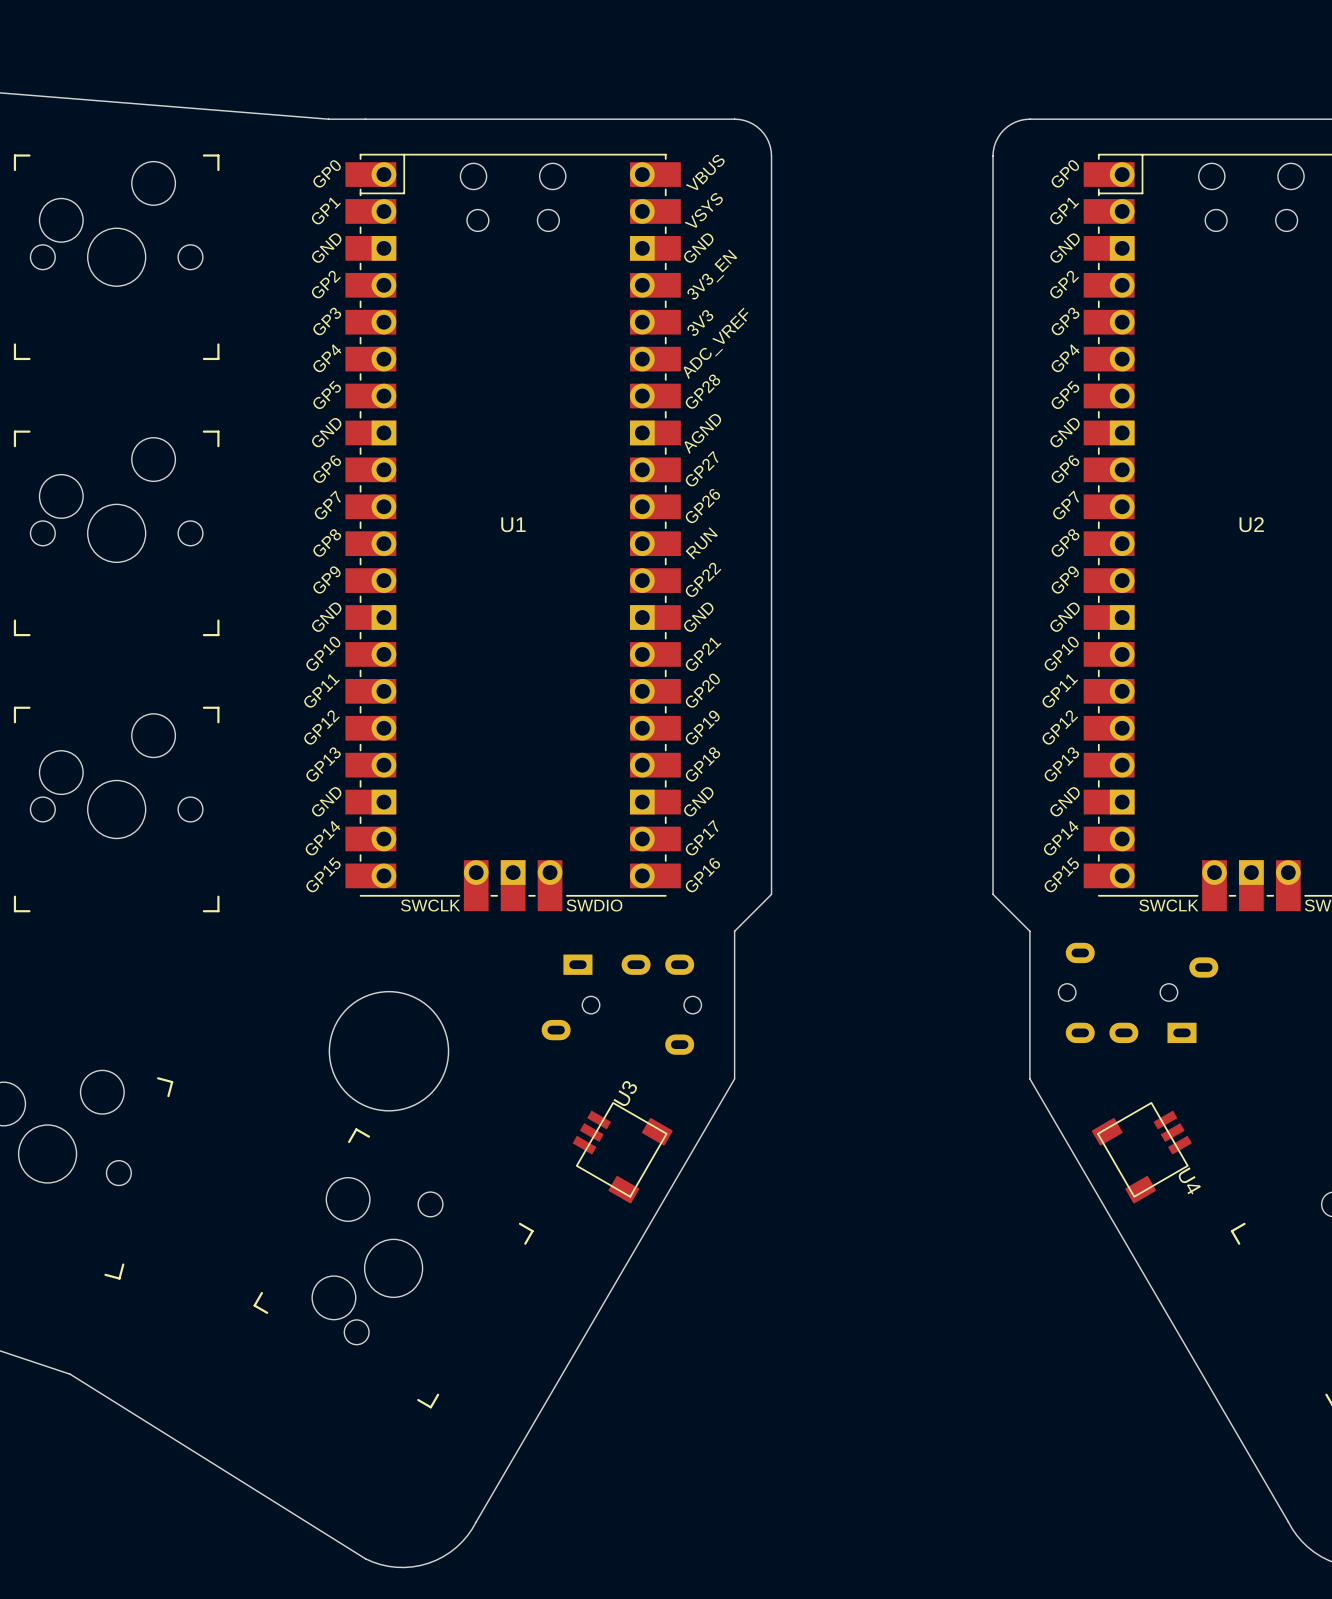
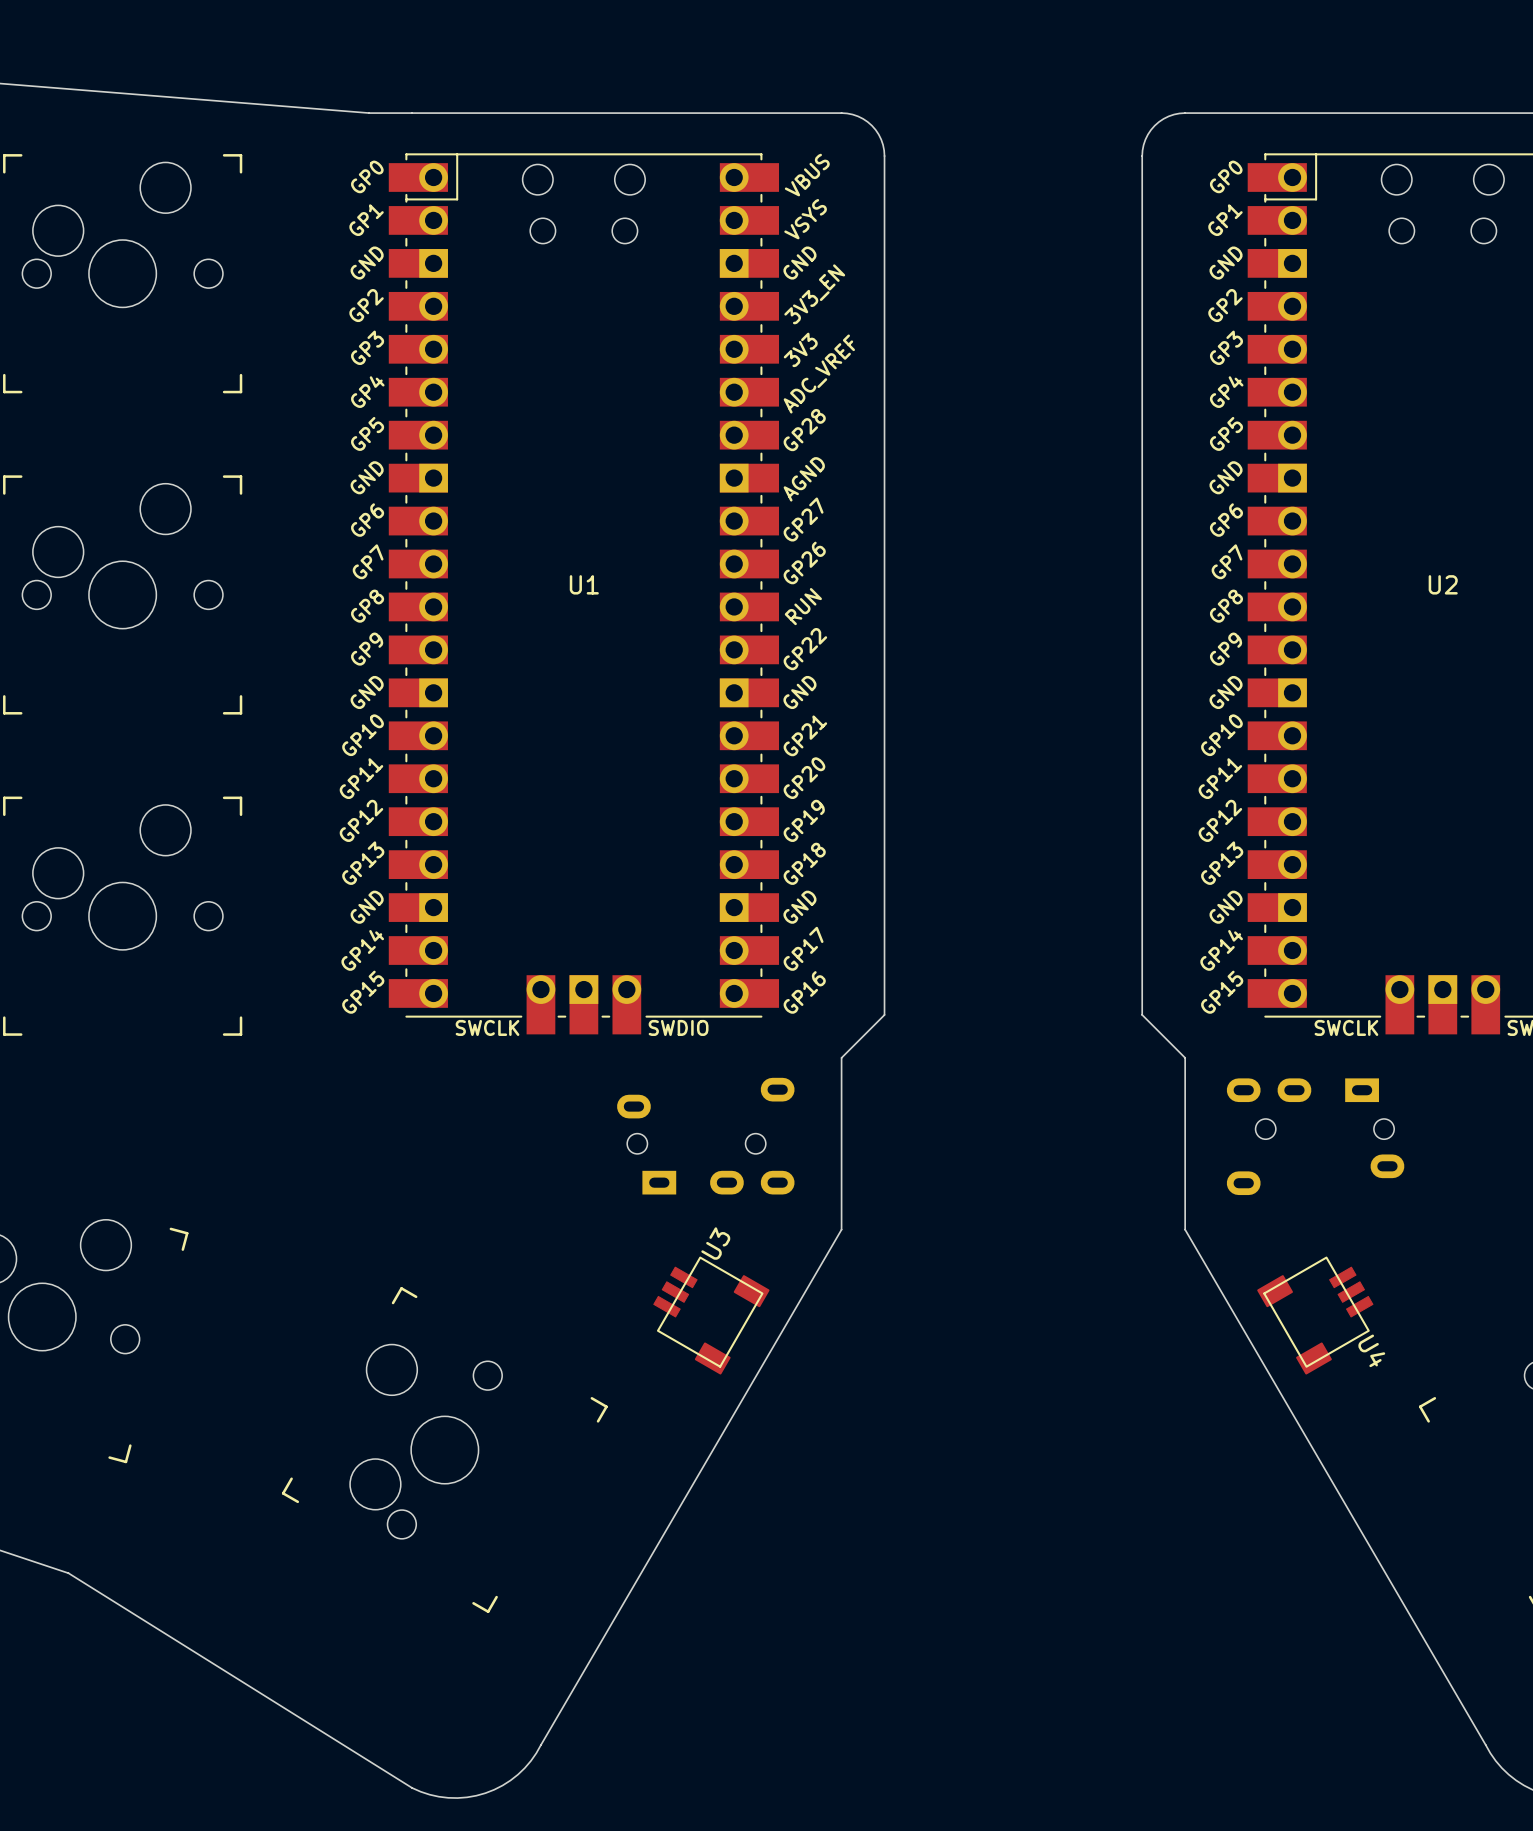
part footprint: [1058, 942, 1219, 1044] -> [1226, 1078, 1405, 1196]
part footprint: [541, 954, 702, 1055] -> [617, 1077, 795, 1195]
round board edge: [328, 990, 450, 1112] -> none

